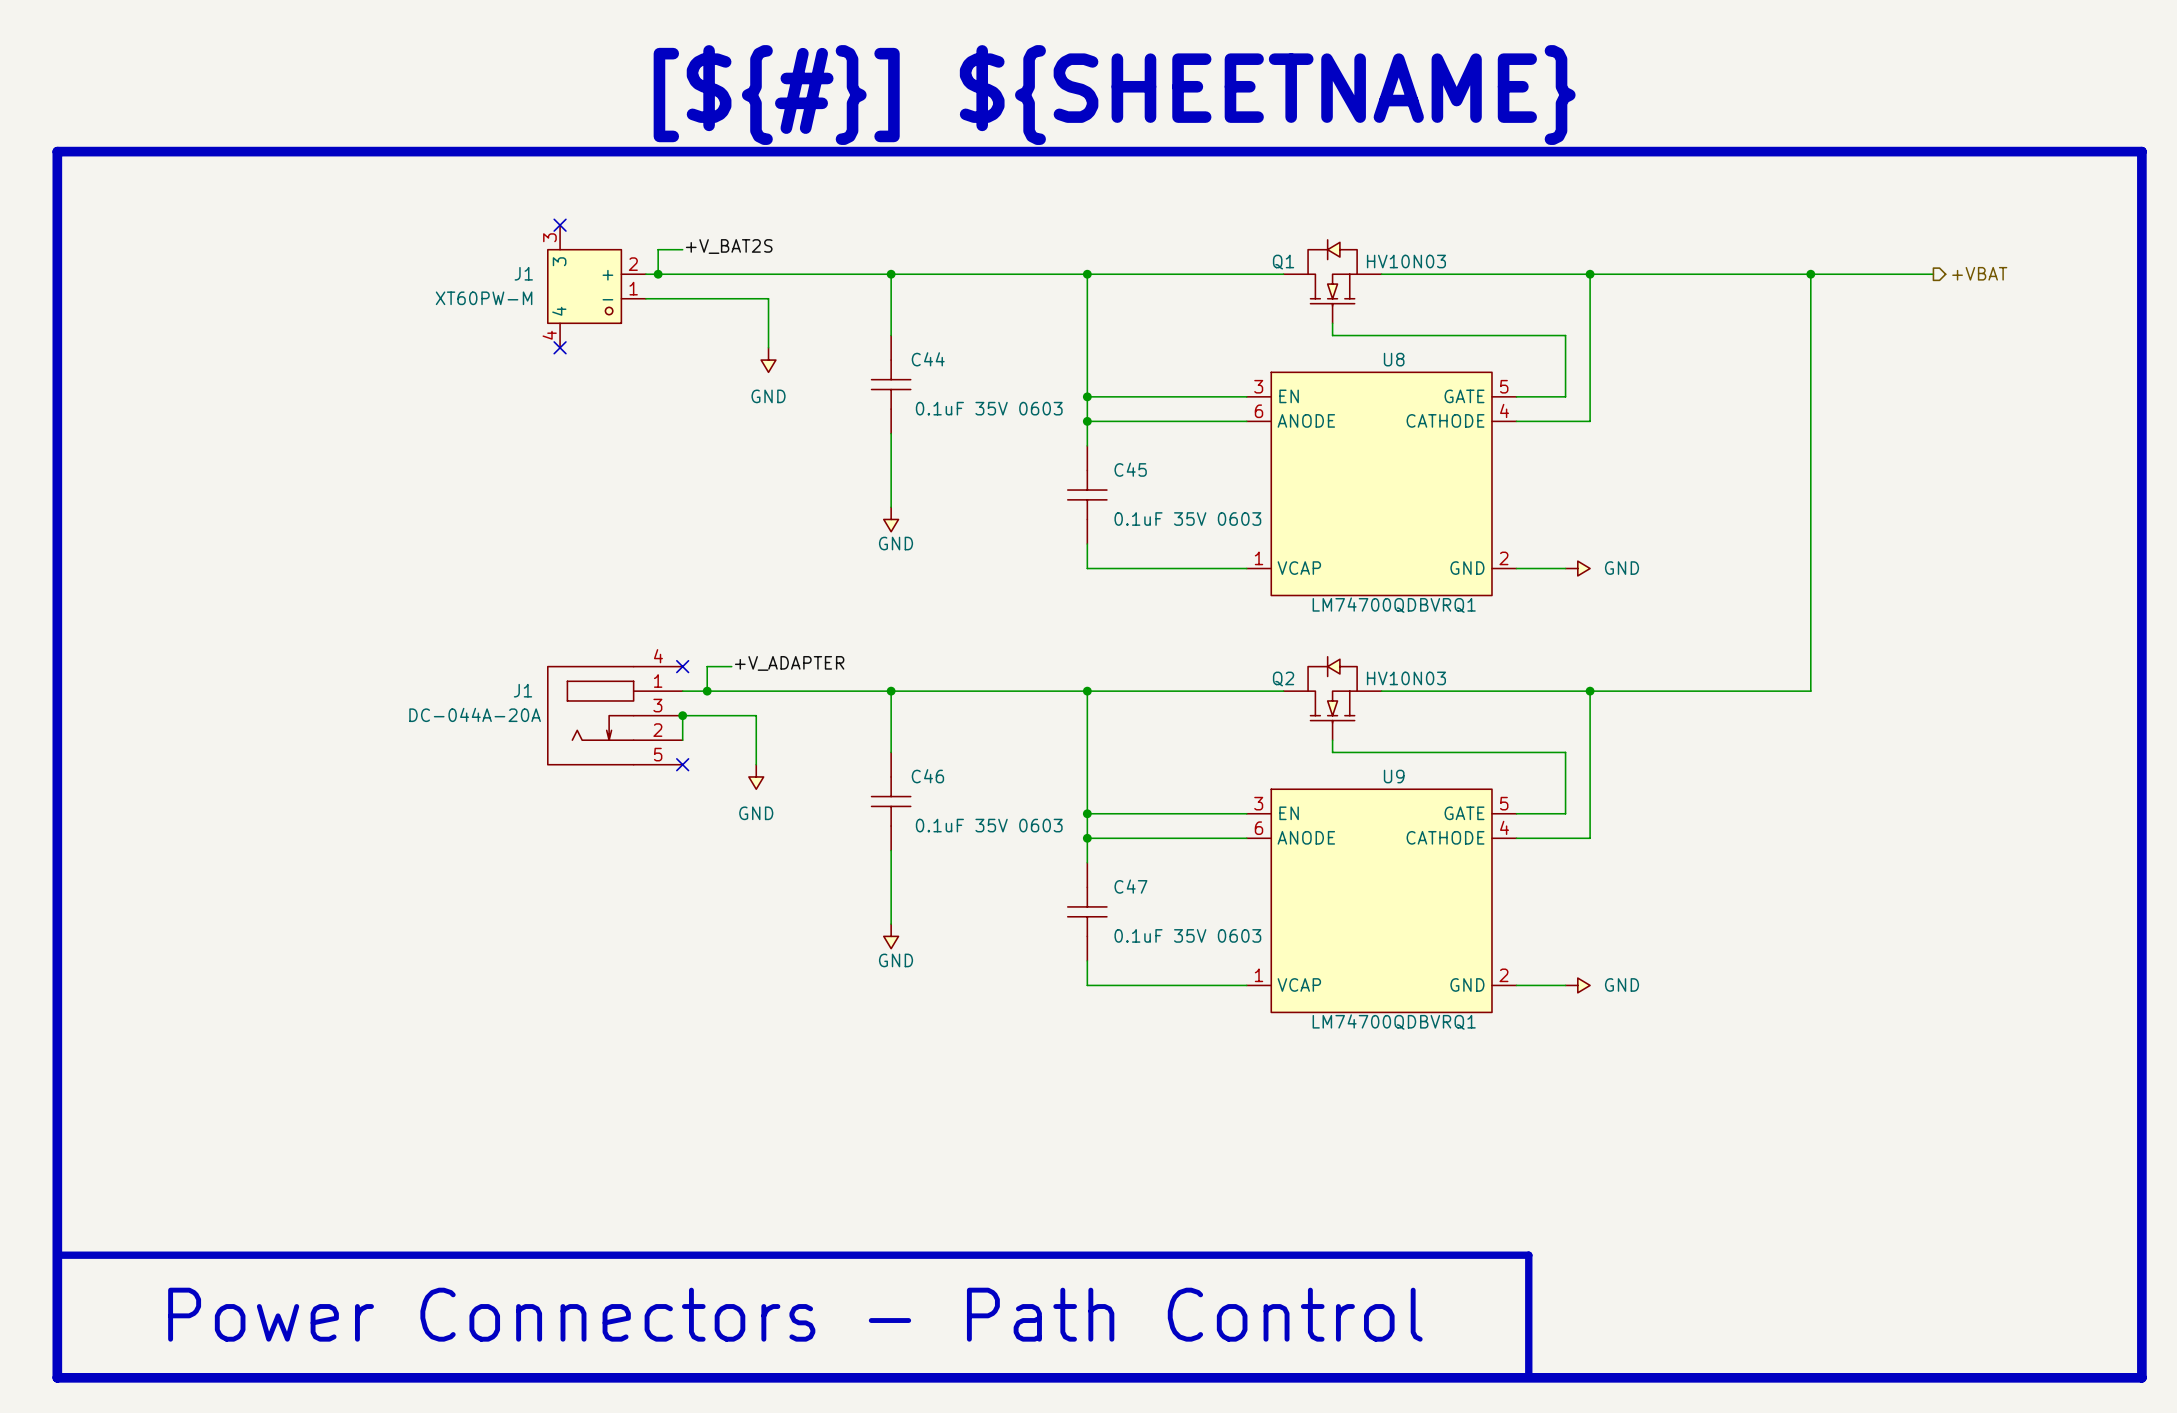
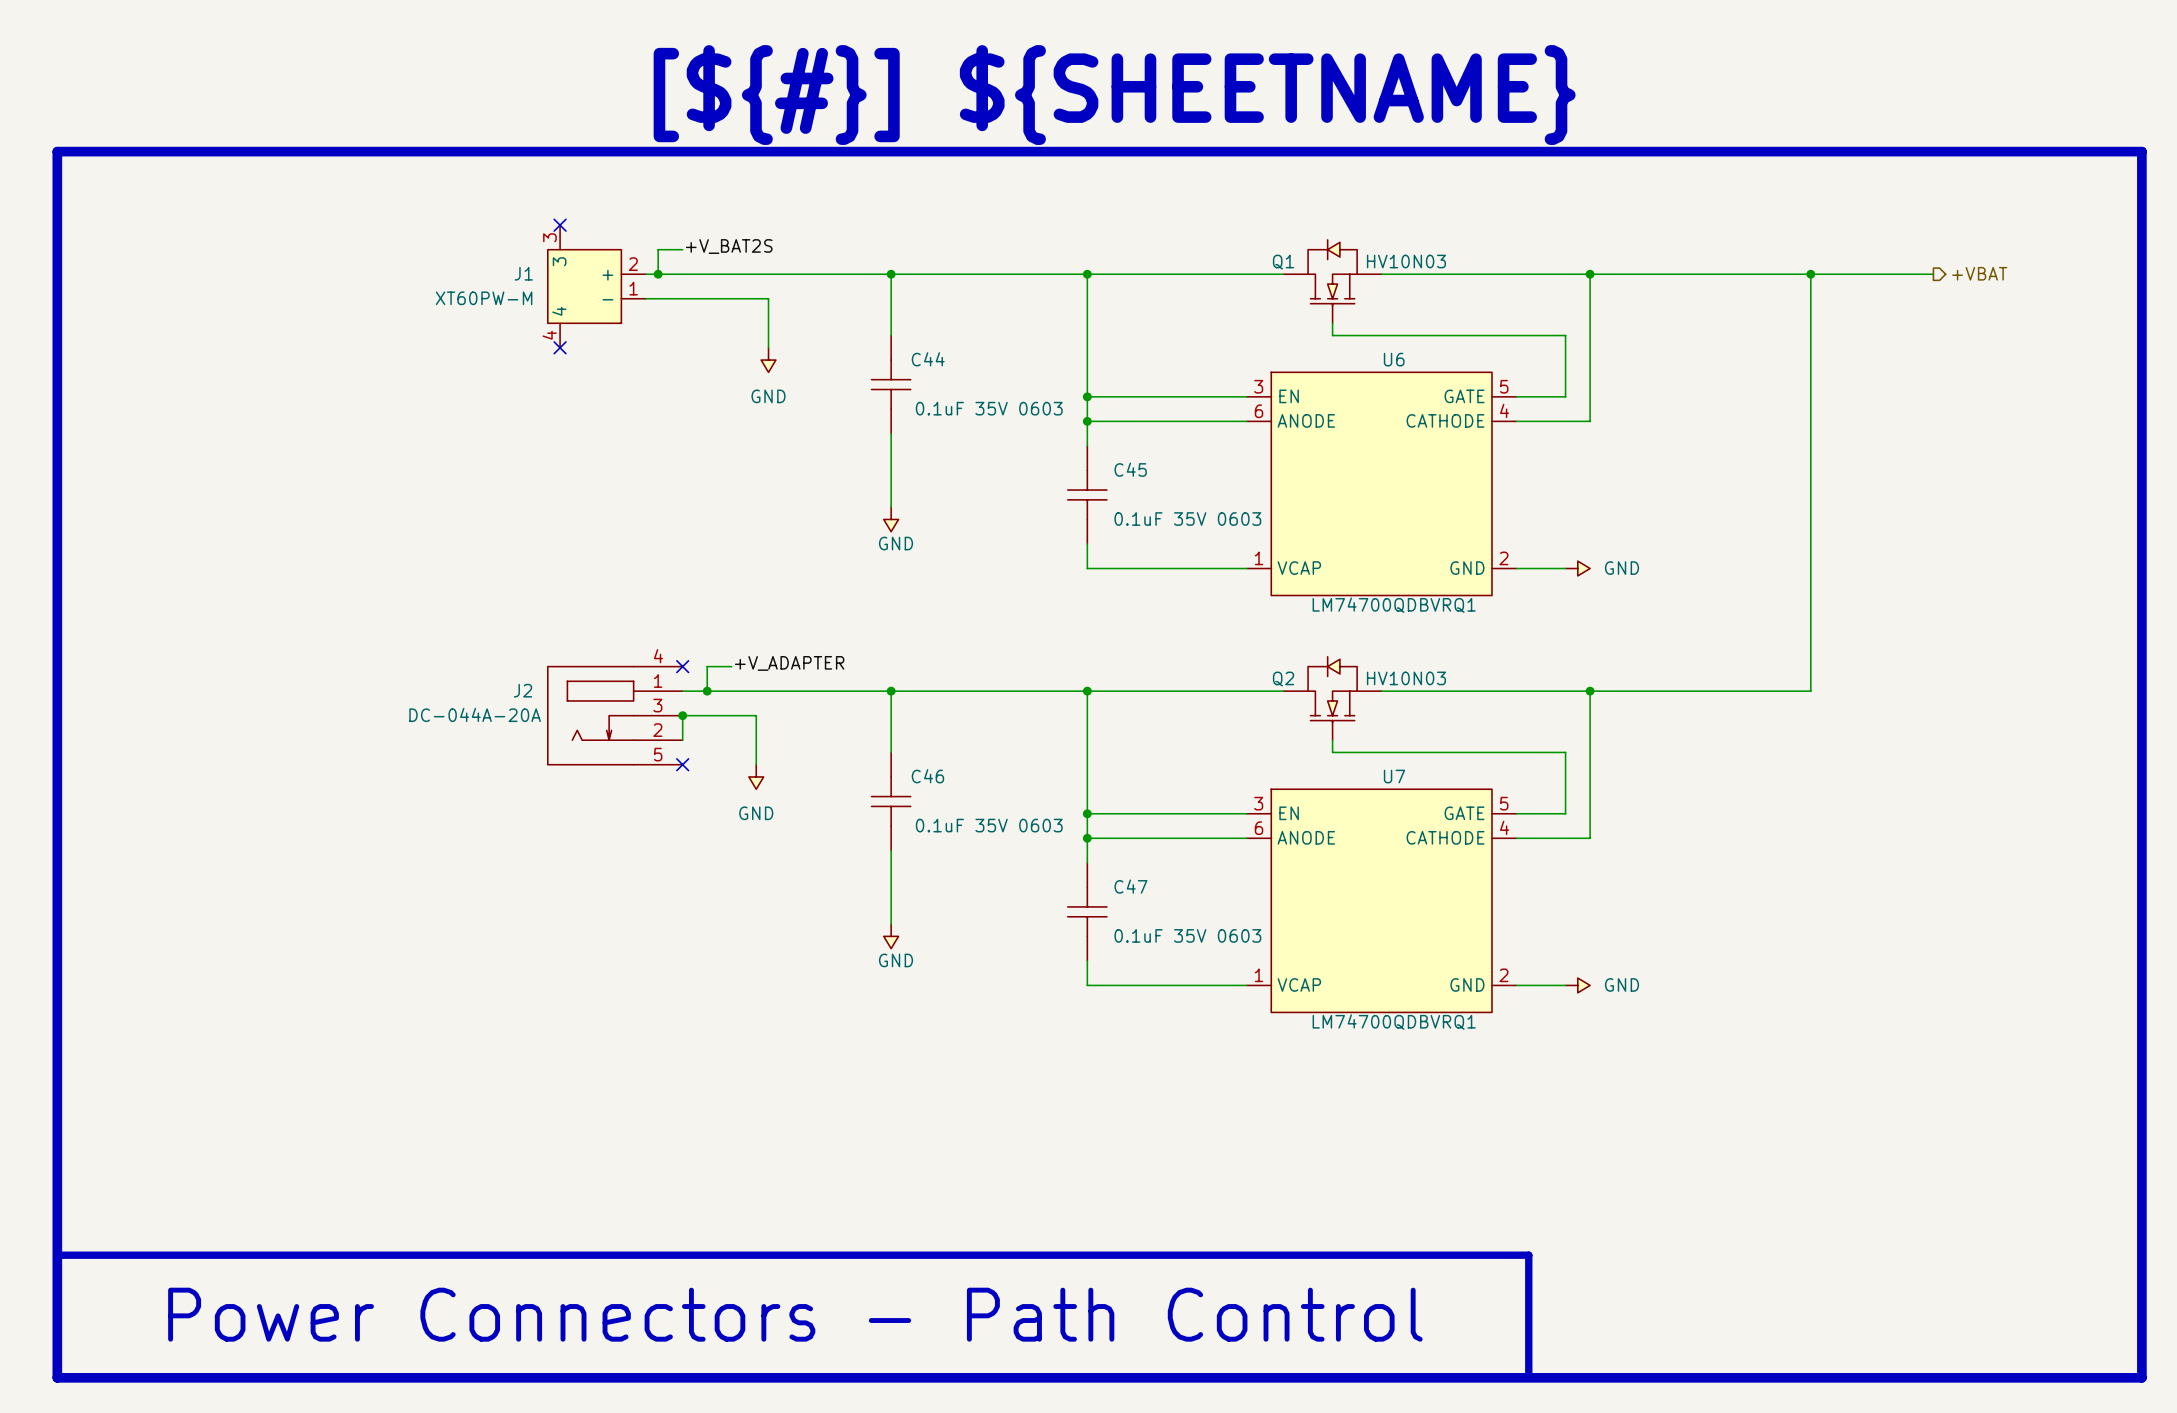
J1 symbol: [547, 225, 646, 348] -> [547, 225, 646, 348]
U8 name: U8 (1394, 359) -> U6 (1394, 359)
J1 name: J1 (522, 690) -> J2 (522, 690)
U9 name: U9 (1394, 776) -> U7 (1394, 776)

